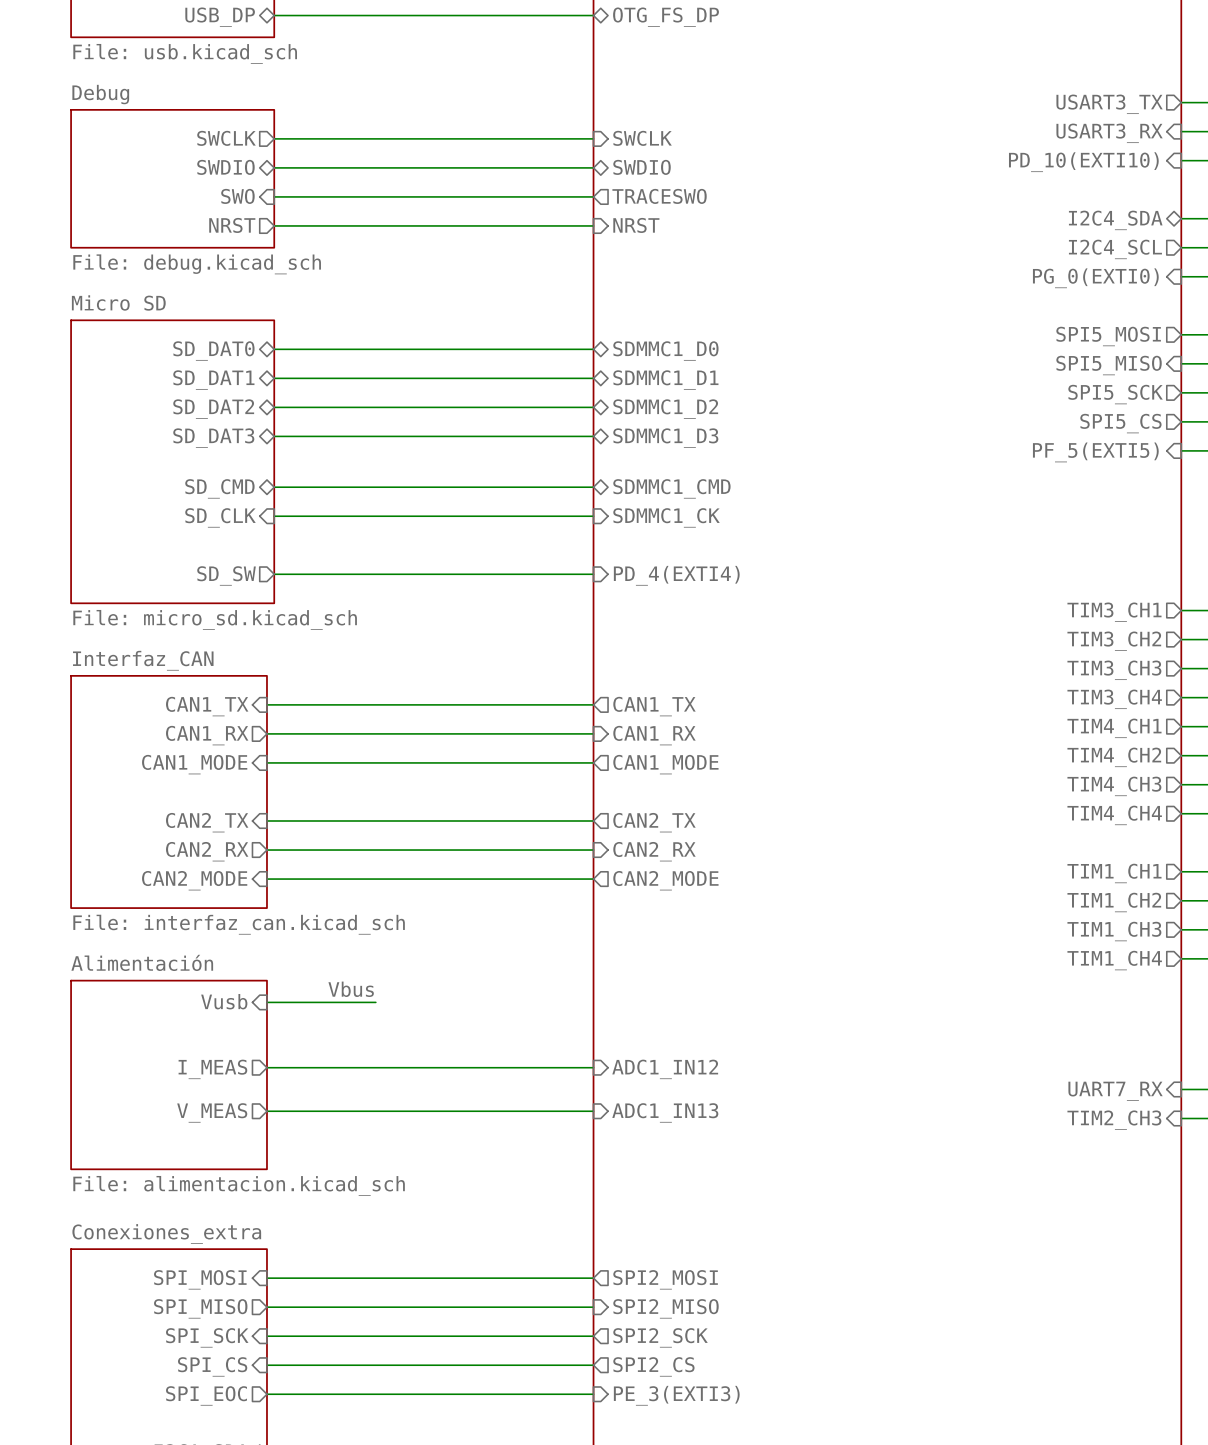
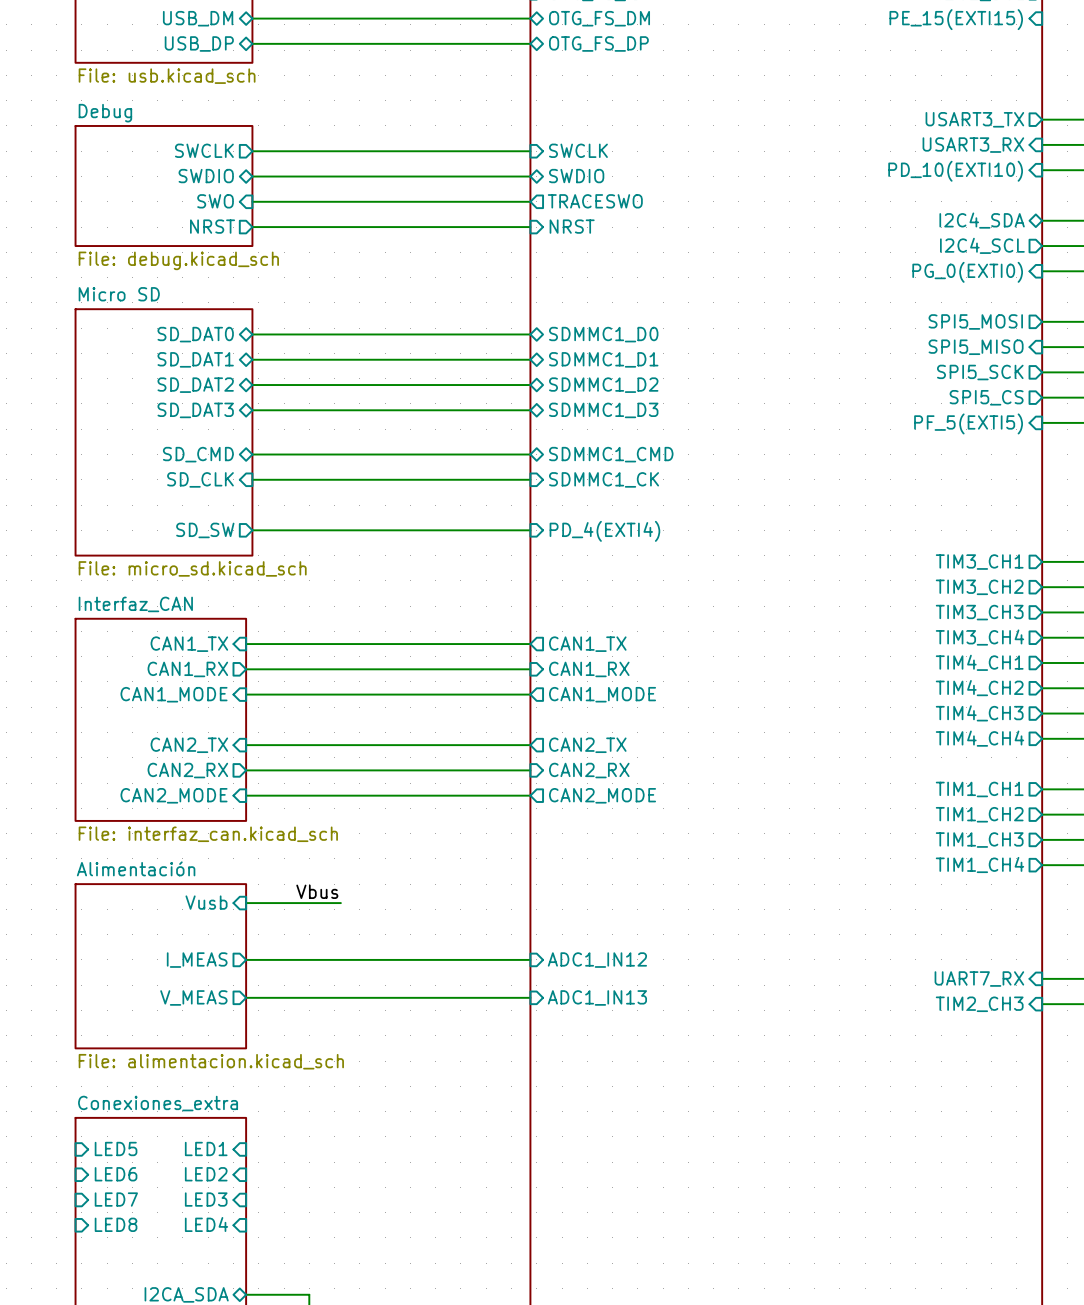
wire: (266, 1278) (593, 1278) -> none
sheet pin: SPI_MOSI (200, 1279) -> LED1 (206, 1148)
sheet pin: SPI2_MOSI (665, 1279) -> none
sheet pin: none -> LED5 (116, 1148)
wire: (266, 1307) (593, 1307) -> none
sheet pin shape: output (200, 1308) -> input (206, 1174)
sheet pin: SPI_MISO (200, 1308) -> LED2 (206, 1174)
sheet pin: SPI2_MISO (665, 1308) -> none
sheet pin: none -> LED6 (116, 1174)
wire: (266, 1336) (593, 1336) -> none
sheet pin: SPI_SCK (207, 1337) -> LED3 (206, 1199)
sheet pin: SPI2_SCK (660, 1337) -> none
sheet pin: none -> LED7 (116, 1199)
wire: (266, 1365) (593, 1365) -> none
sheet pin: SPI_CS (212, 1366) -> LED4 (206, 1224)
sheet pin: SPI2_CS (653, 1366) -> none
sheet pin: none -> LED8 (116, 1224)
wire: (266, 1394) (593, 1394) -> none
sheet pin: SPI_EOC (206, 1395) -> none
sheet pin: PE_3(EXTI3) (676, 1395) -> none

